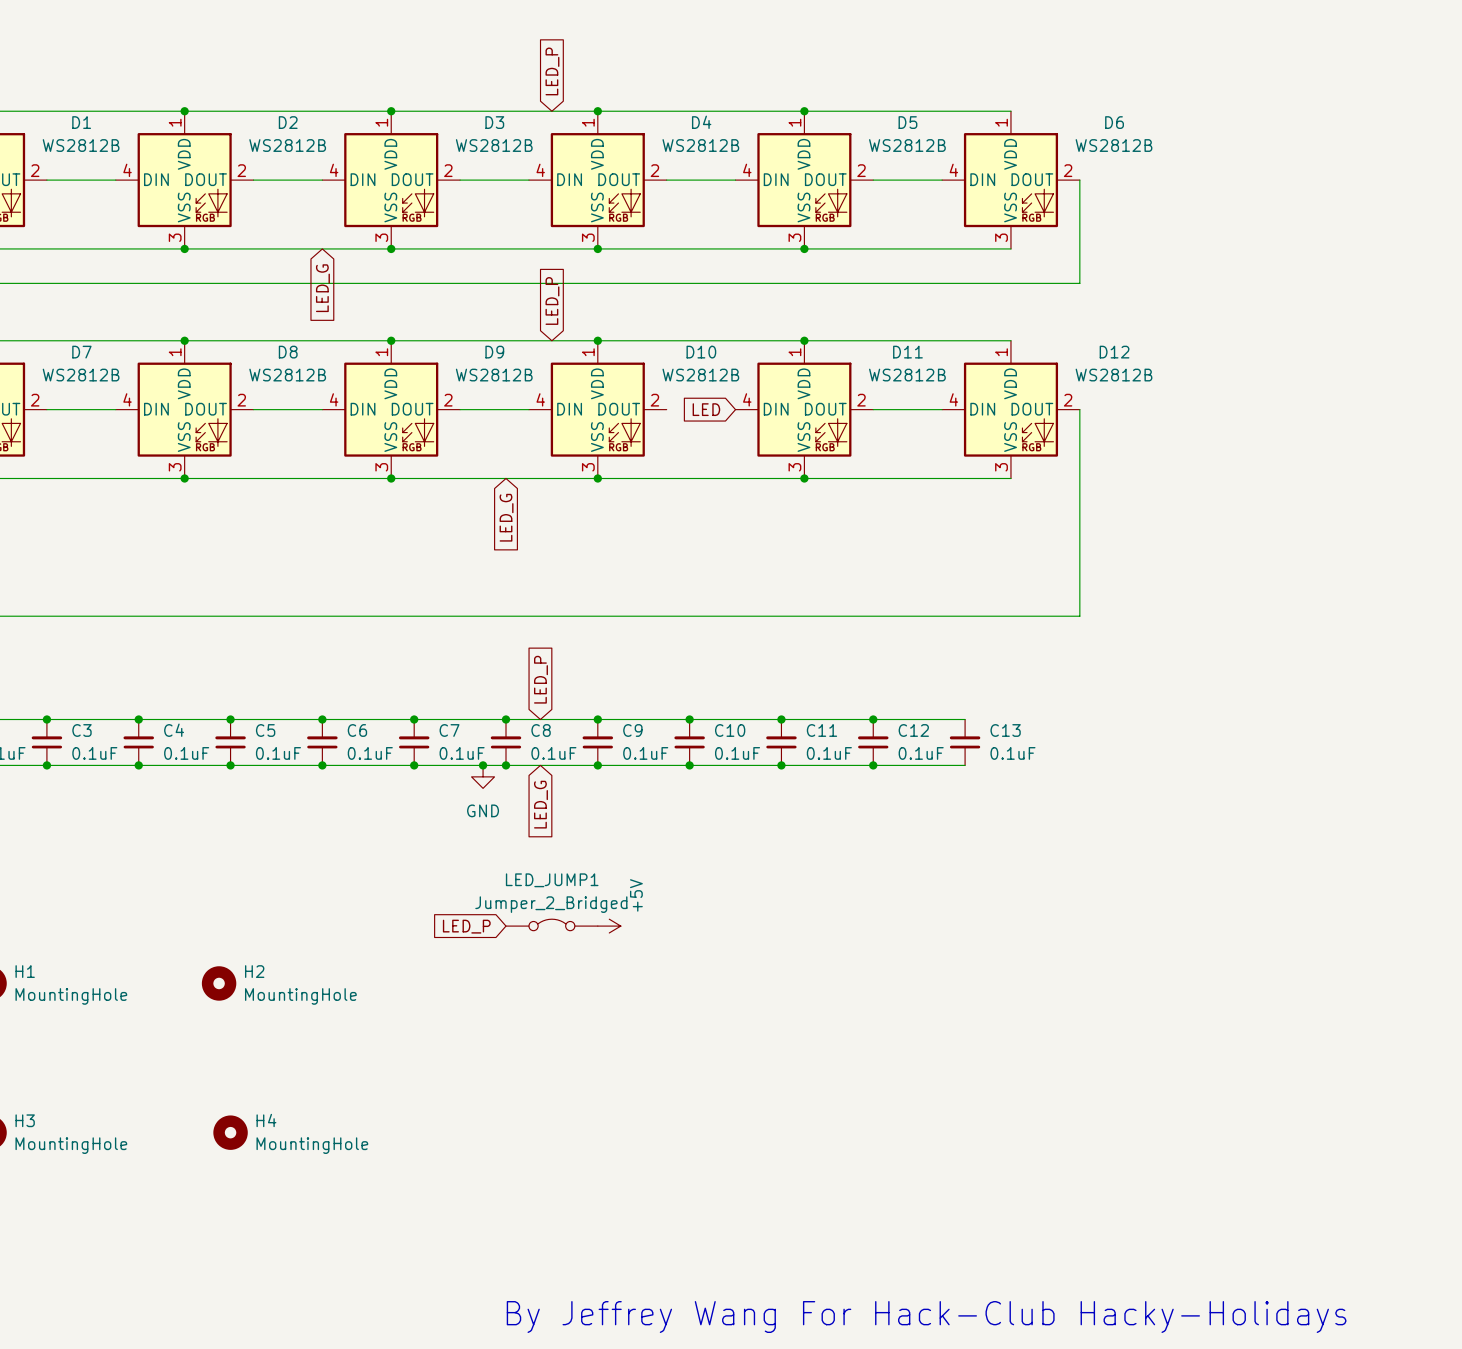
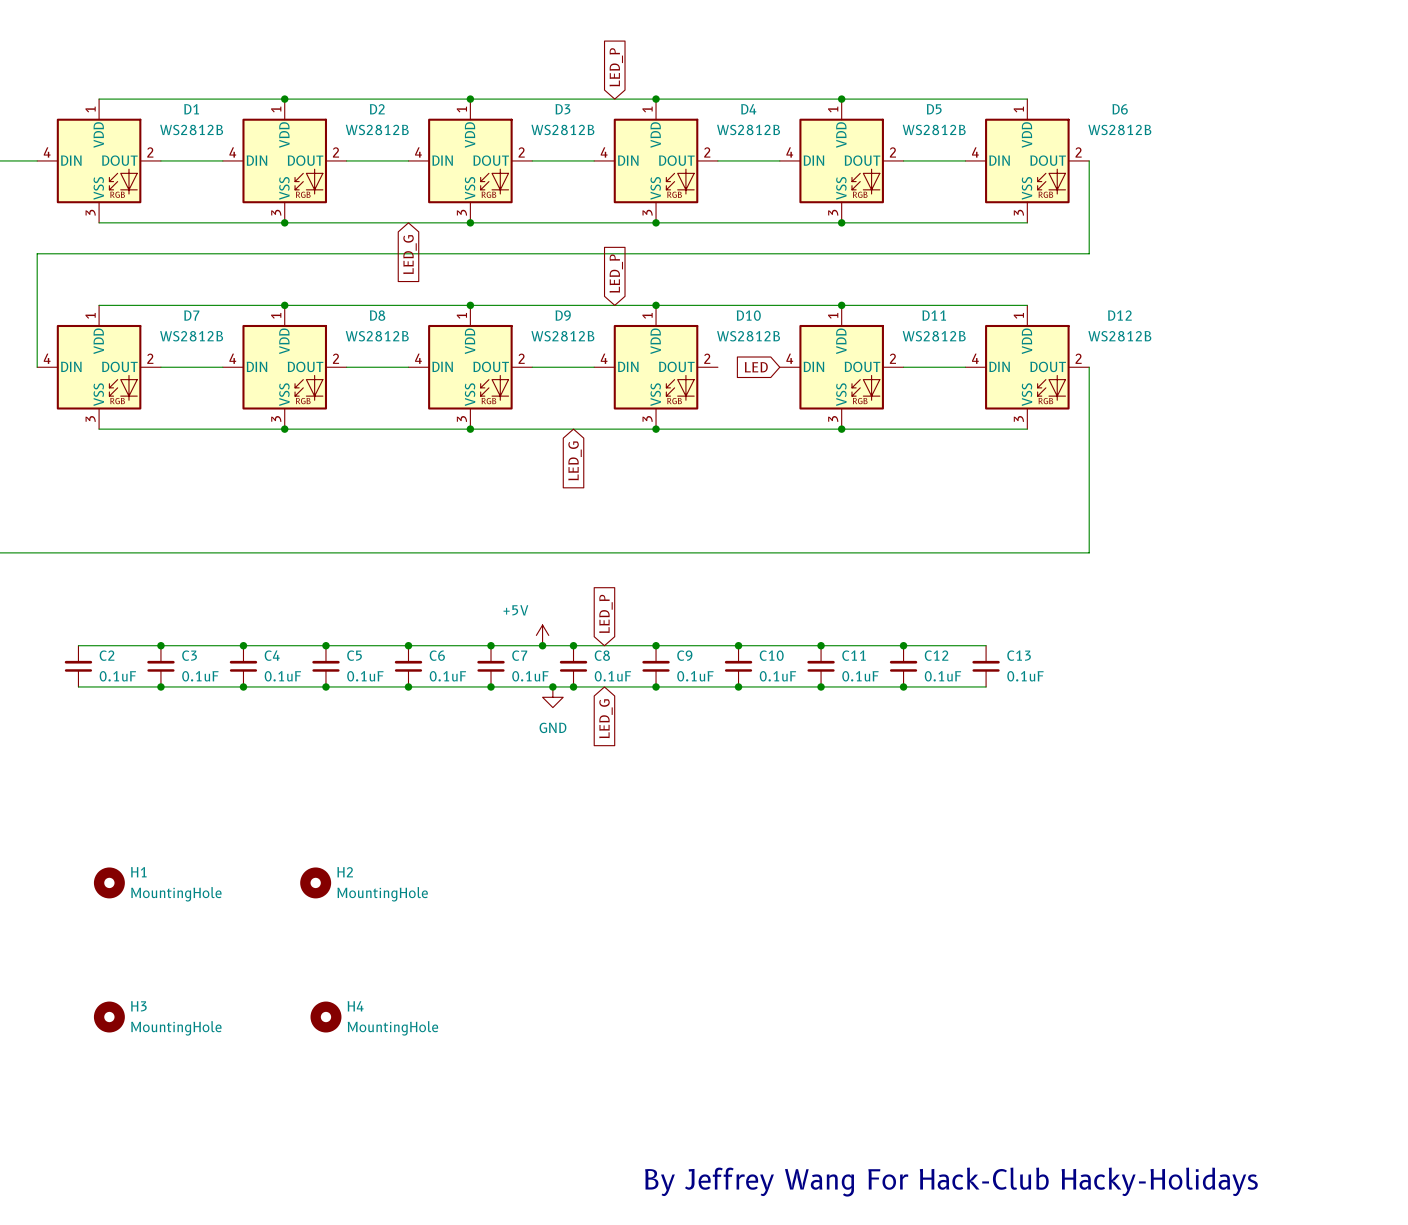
power symbol: none -> +5V (542, 635)
junction: none -> (542, 645)
LED_JUMP1: Jumper_2_Bridged (551, 924) -> none
global label: LED_P (466, 926) -> none
power symbol: +5V (609, 926) -> none

